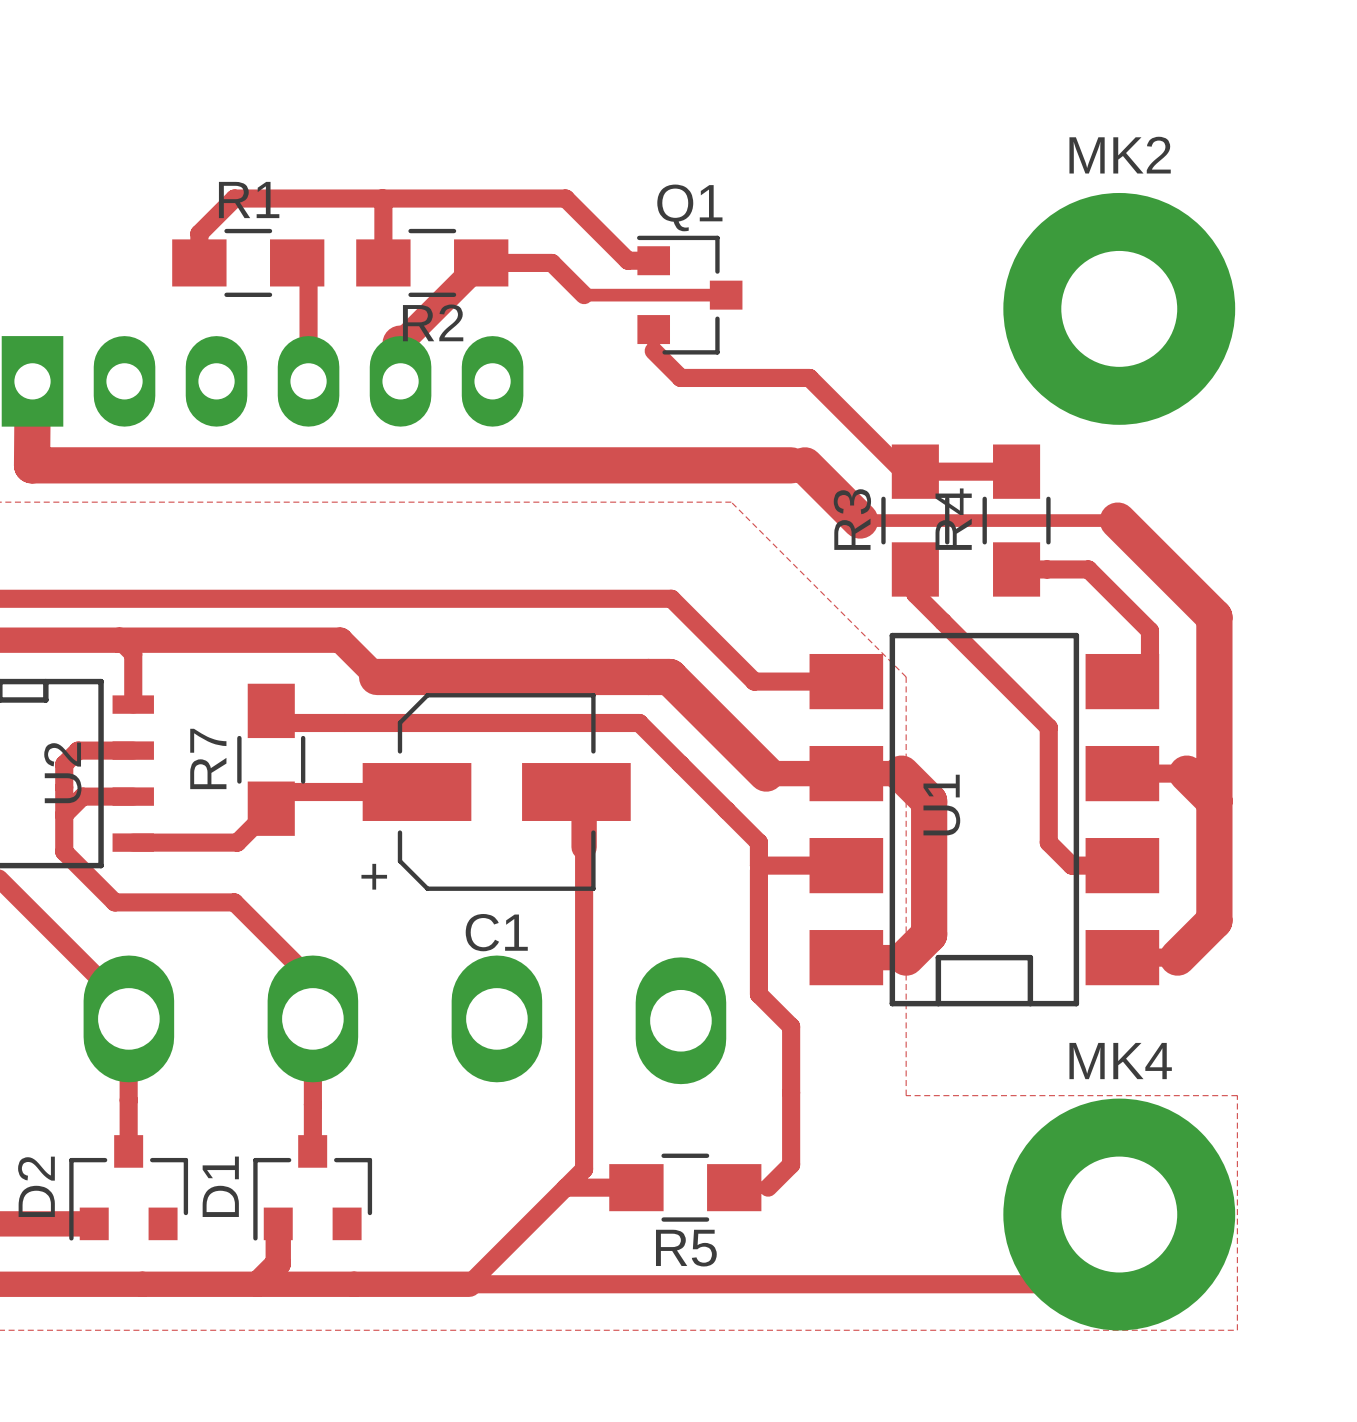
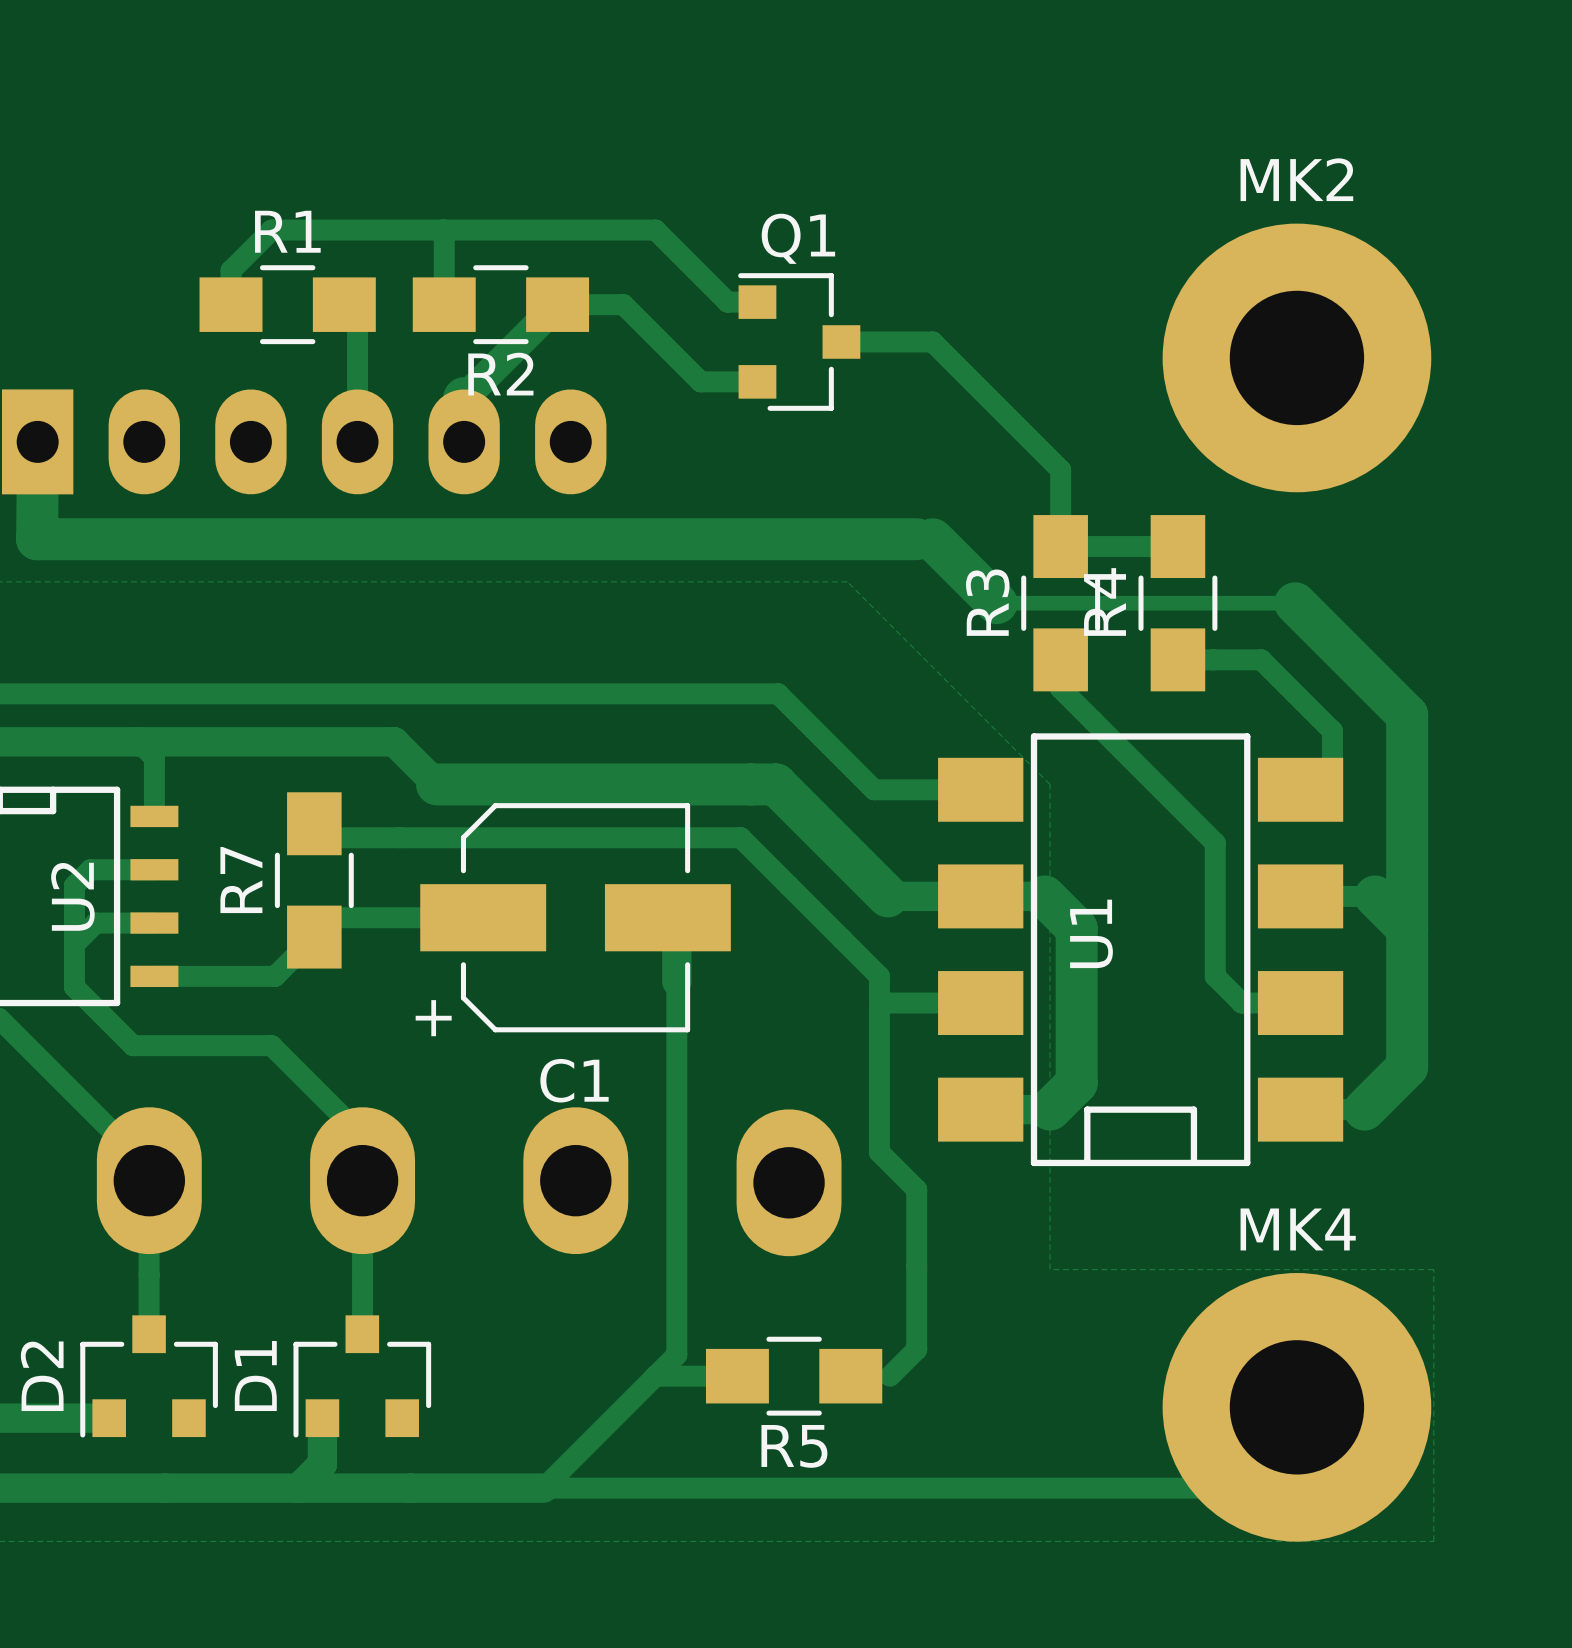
track: (538, 262) (551, 262) (584, 295) (726, 295) -> (623, 304) (700, 381) (757, 381)
track: none -> (841, 341) (932, 341) (1060, 469) (1060, 546)
track: (653, 329) (653, 350) (680, 377) (809, 377) (903, 471) -> none

